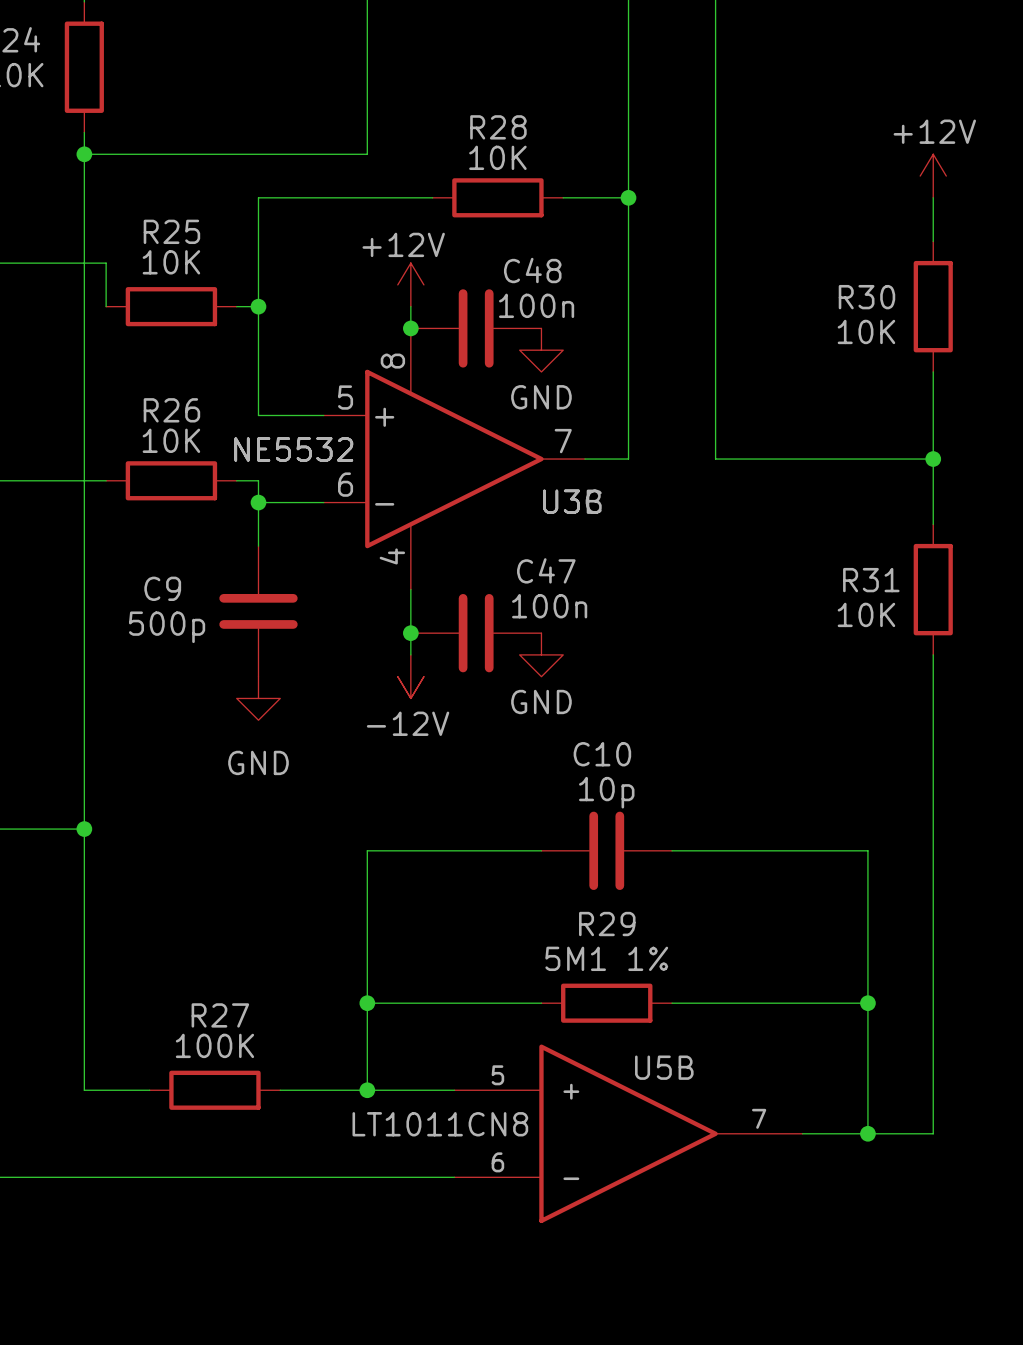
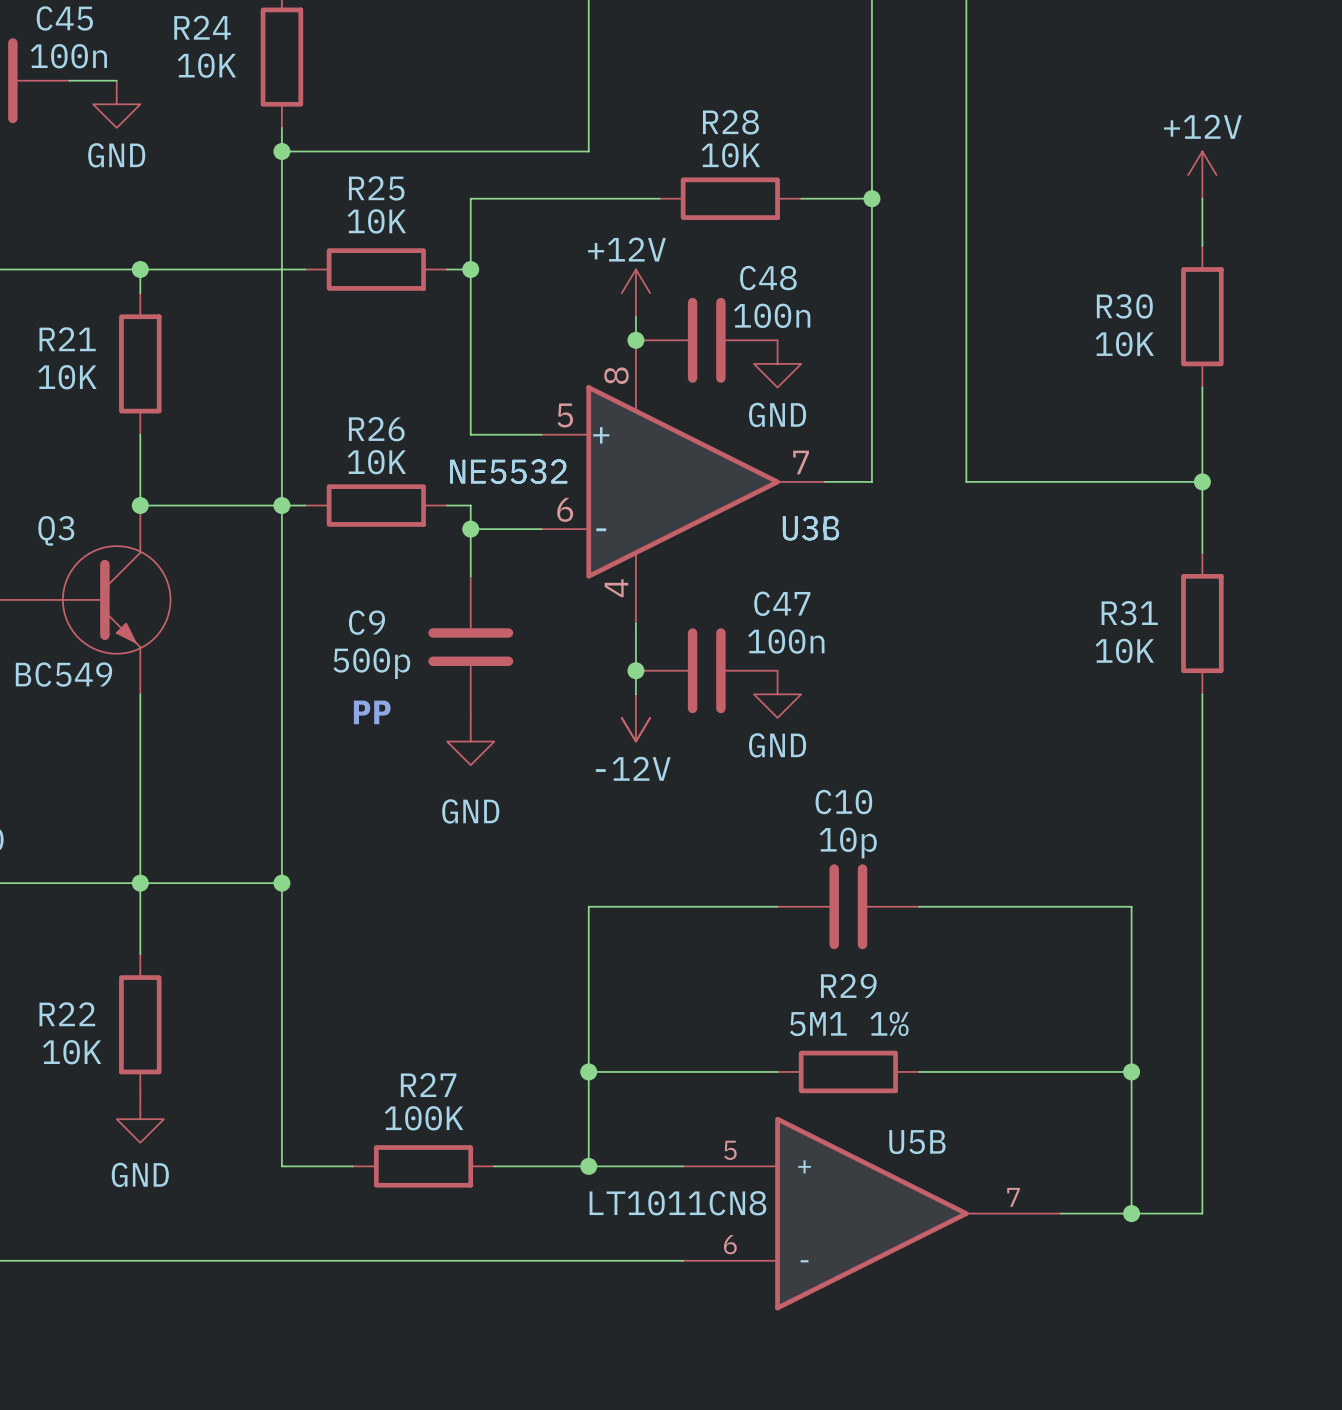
wire: (106, 263) (106, 306) -> none
R25 position: (171, 306) -> (376, 269)
wire: (236, 306) (258, 306) -> (447, 269) (470, 269)
junction position: (258, 306) -> (470, 269)
junction: none -> (281, 505)
text: none -> PP (372, 712)

